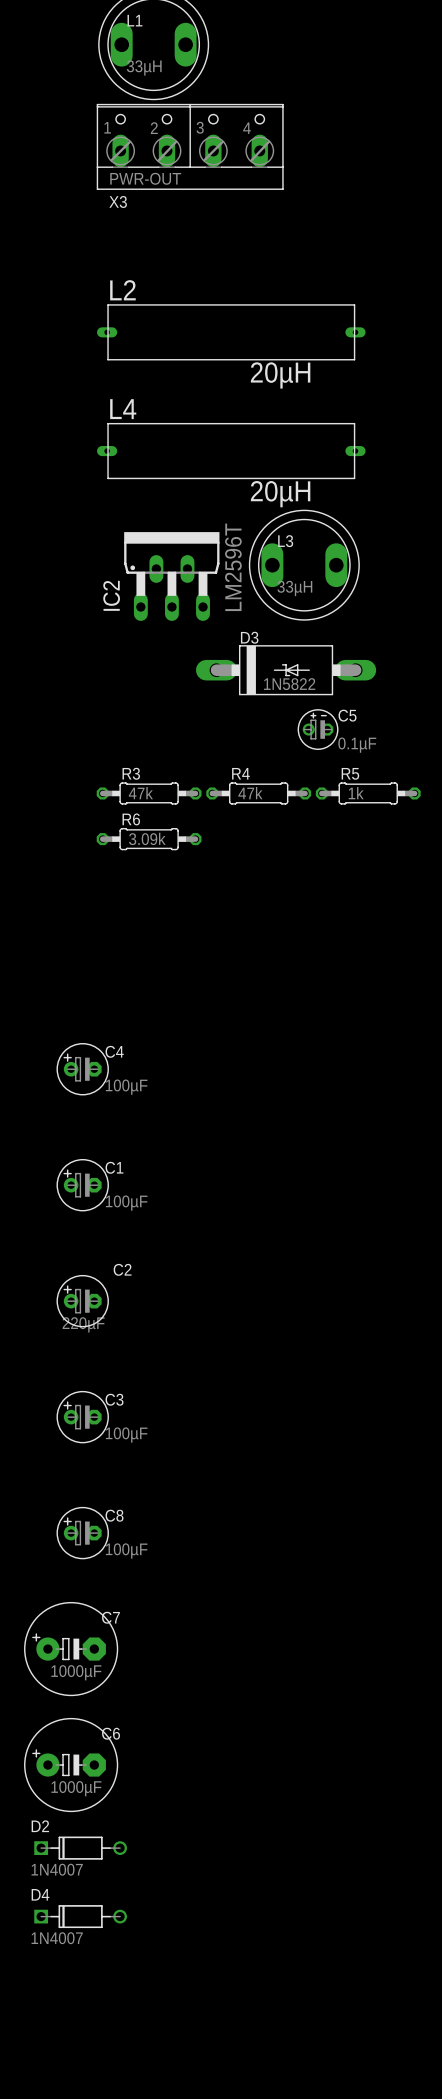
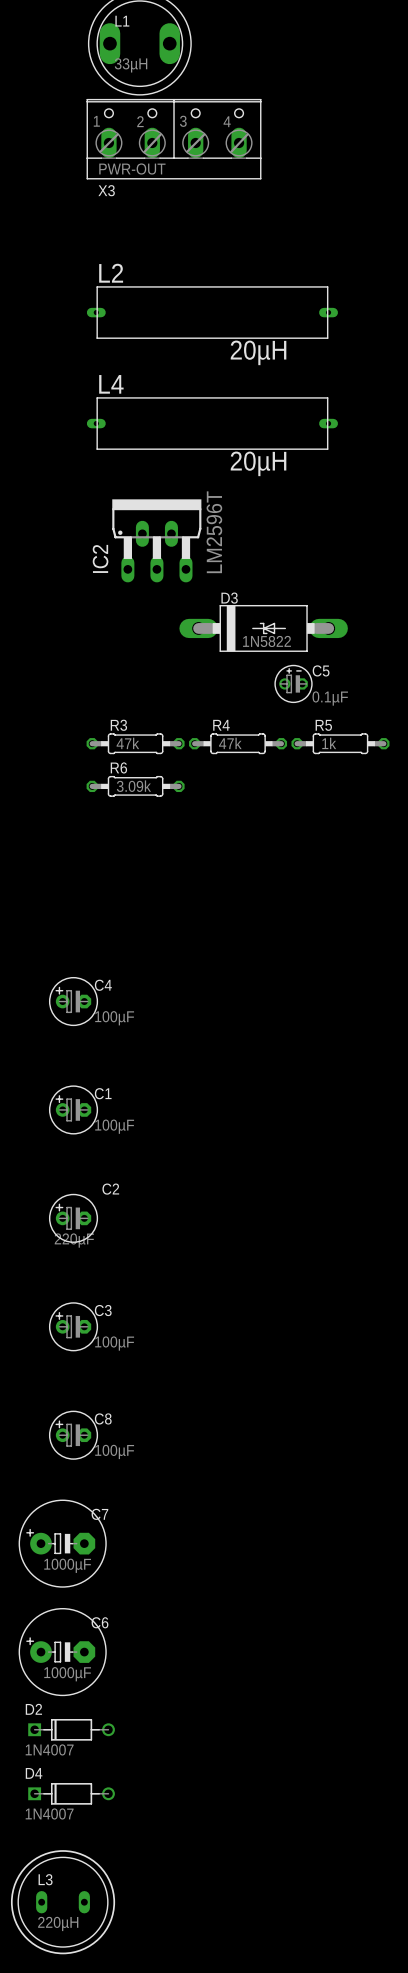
L3 footprint: [249, 509, 360, 621] -> [10, 1850, 116, 1955]
L3 value: 33µH (294, 588) -> 220µH (58, 1923)

